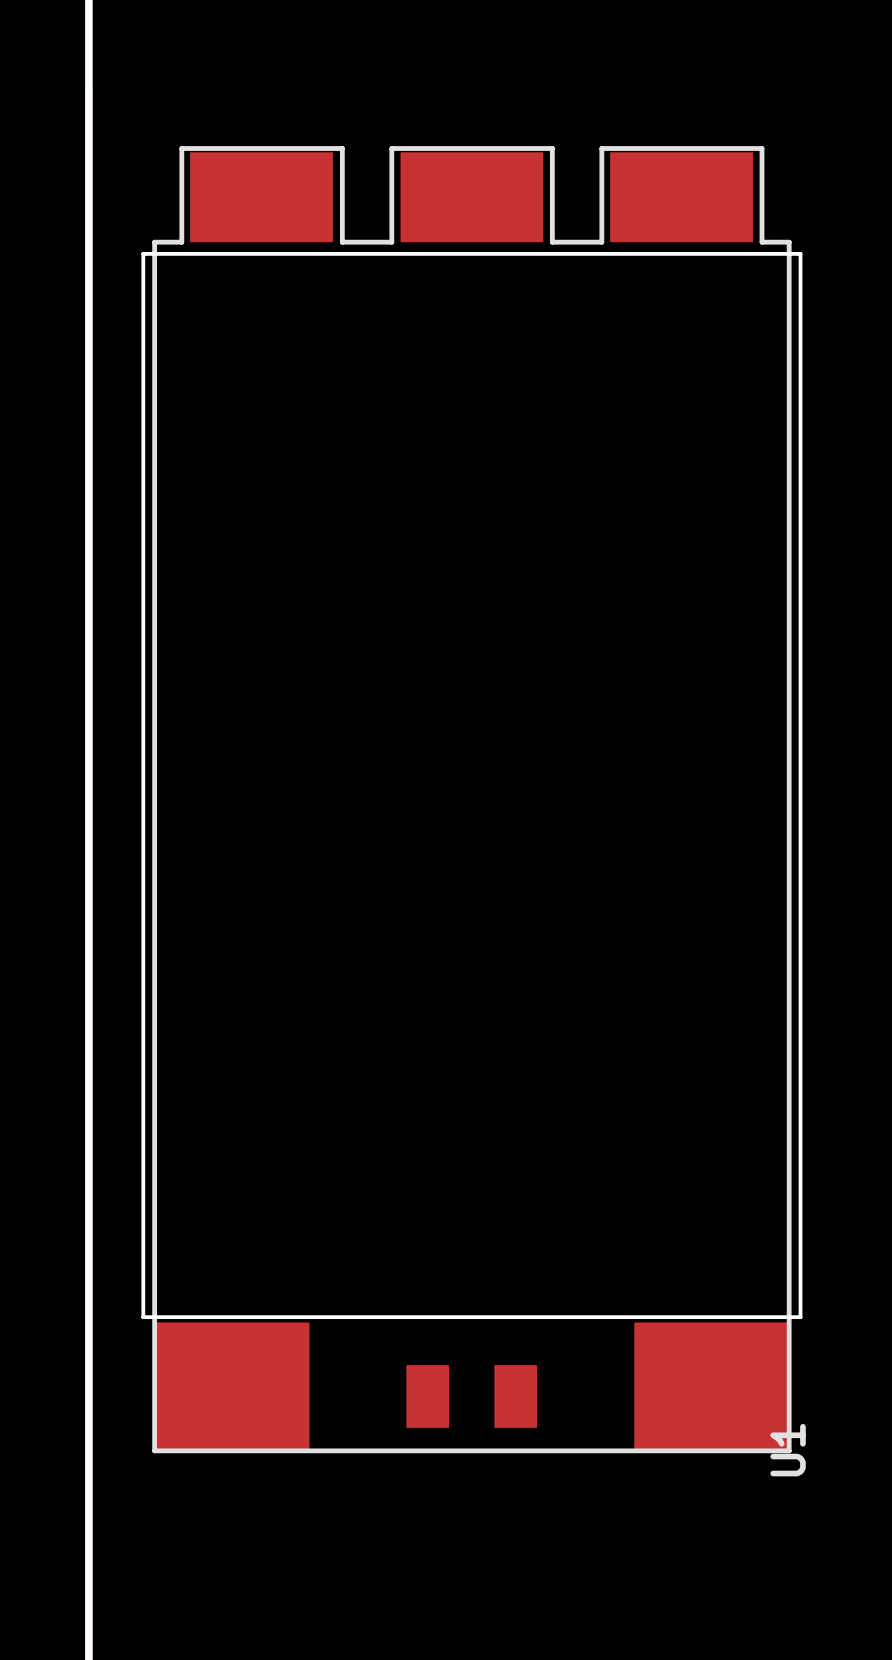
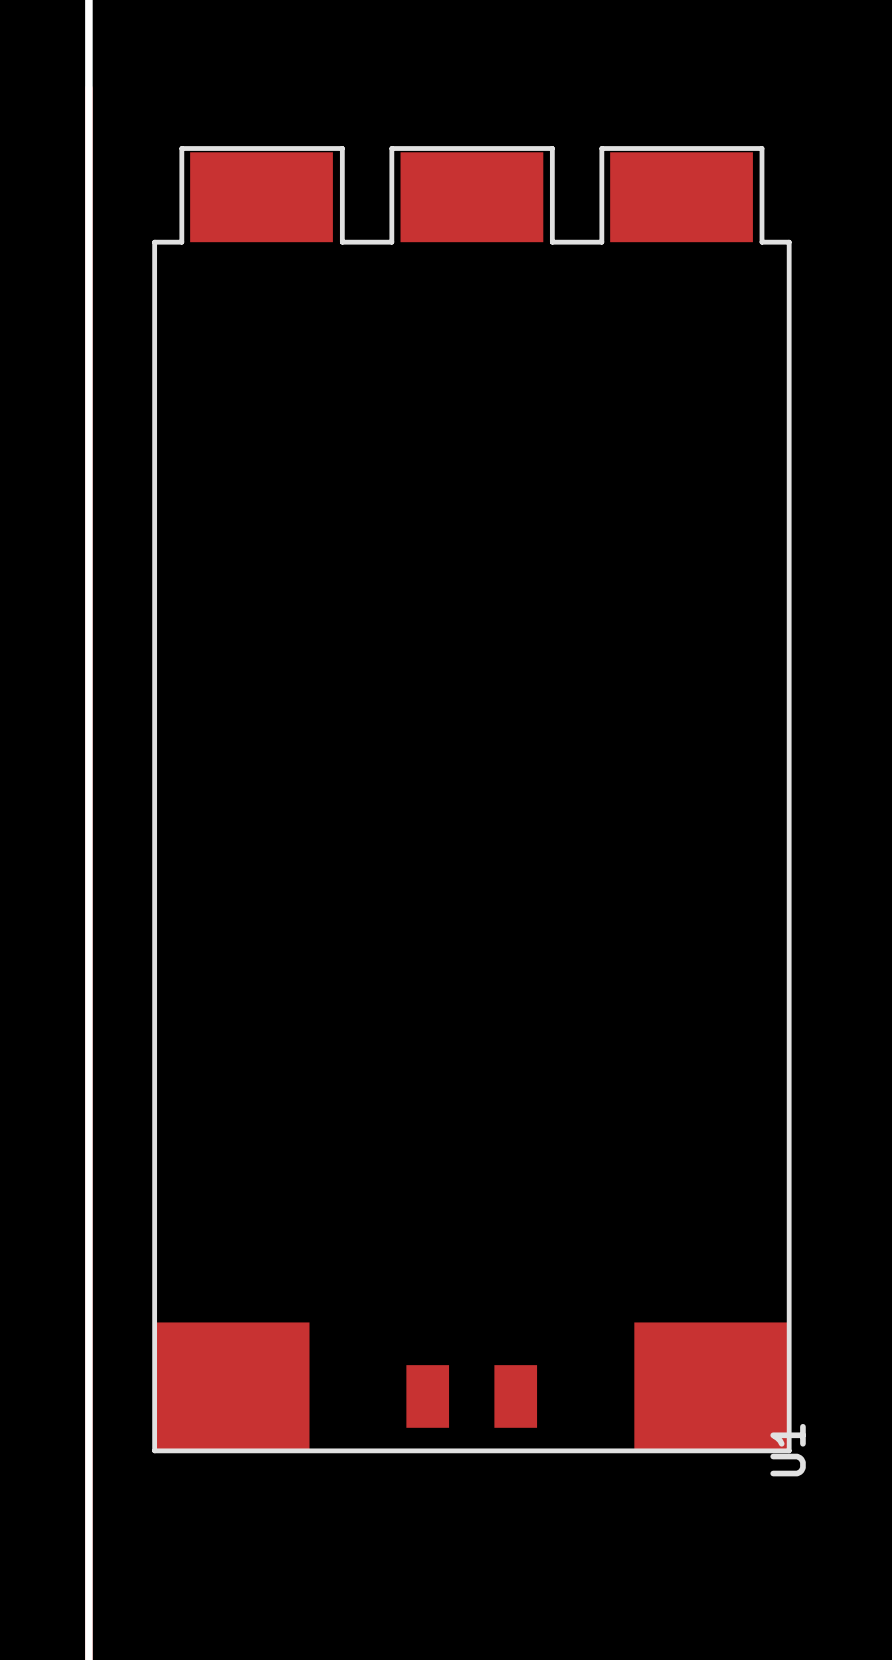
board edge: (143, 253) (800, 253) (800, 1317) (143, 1317) (143, 253) -> none

